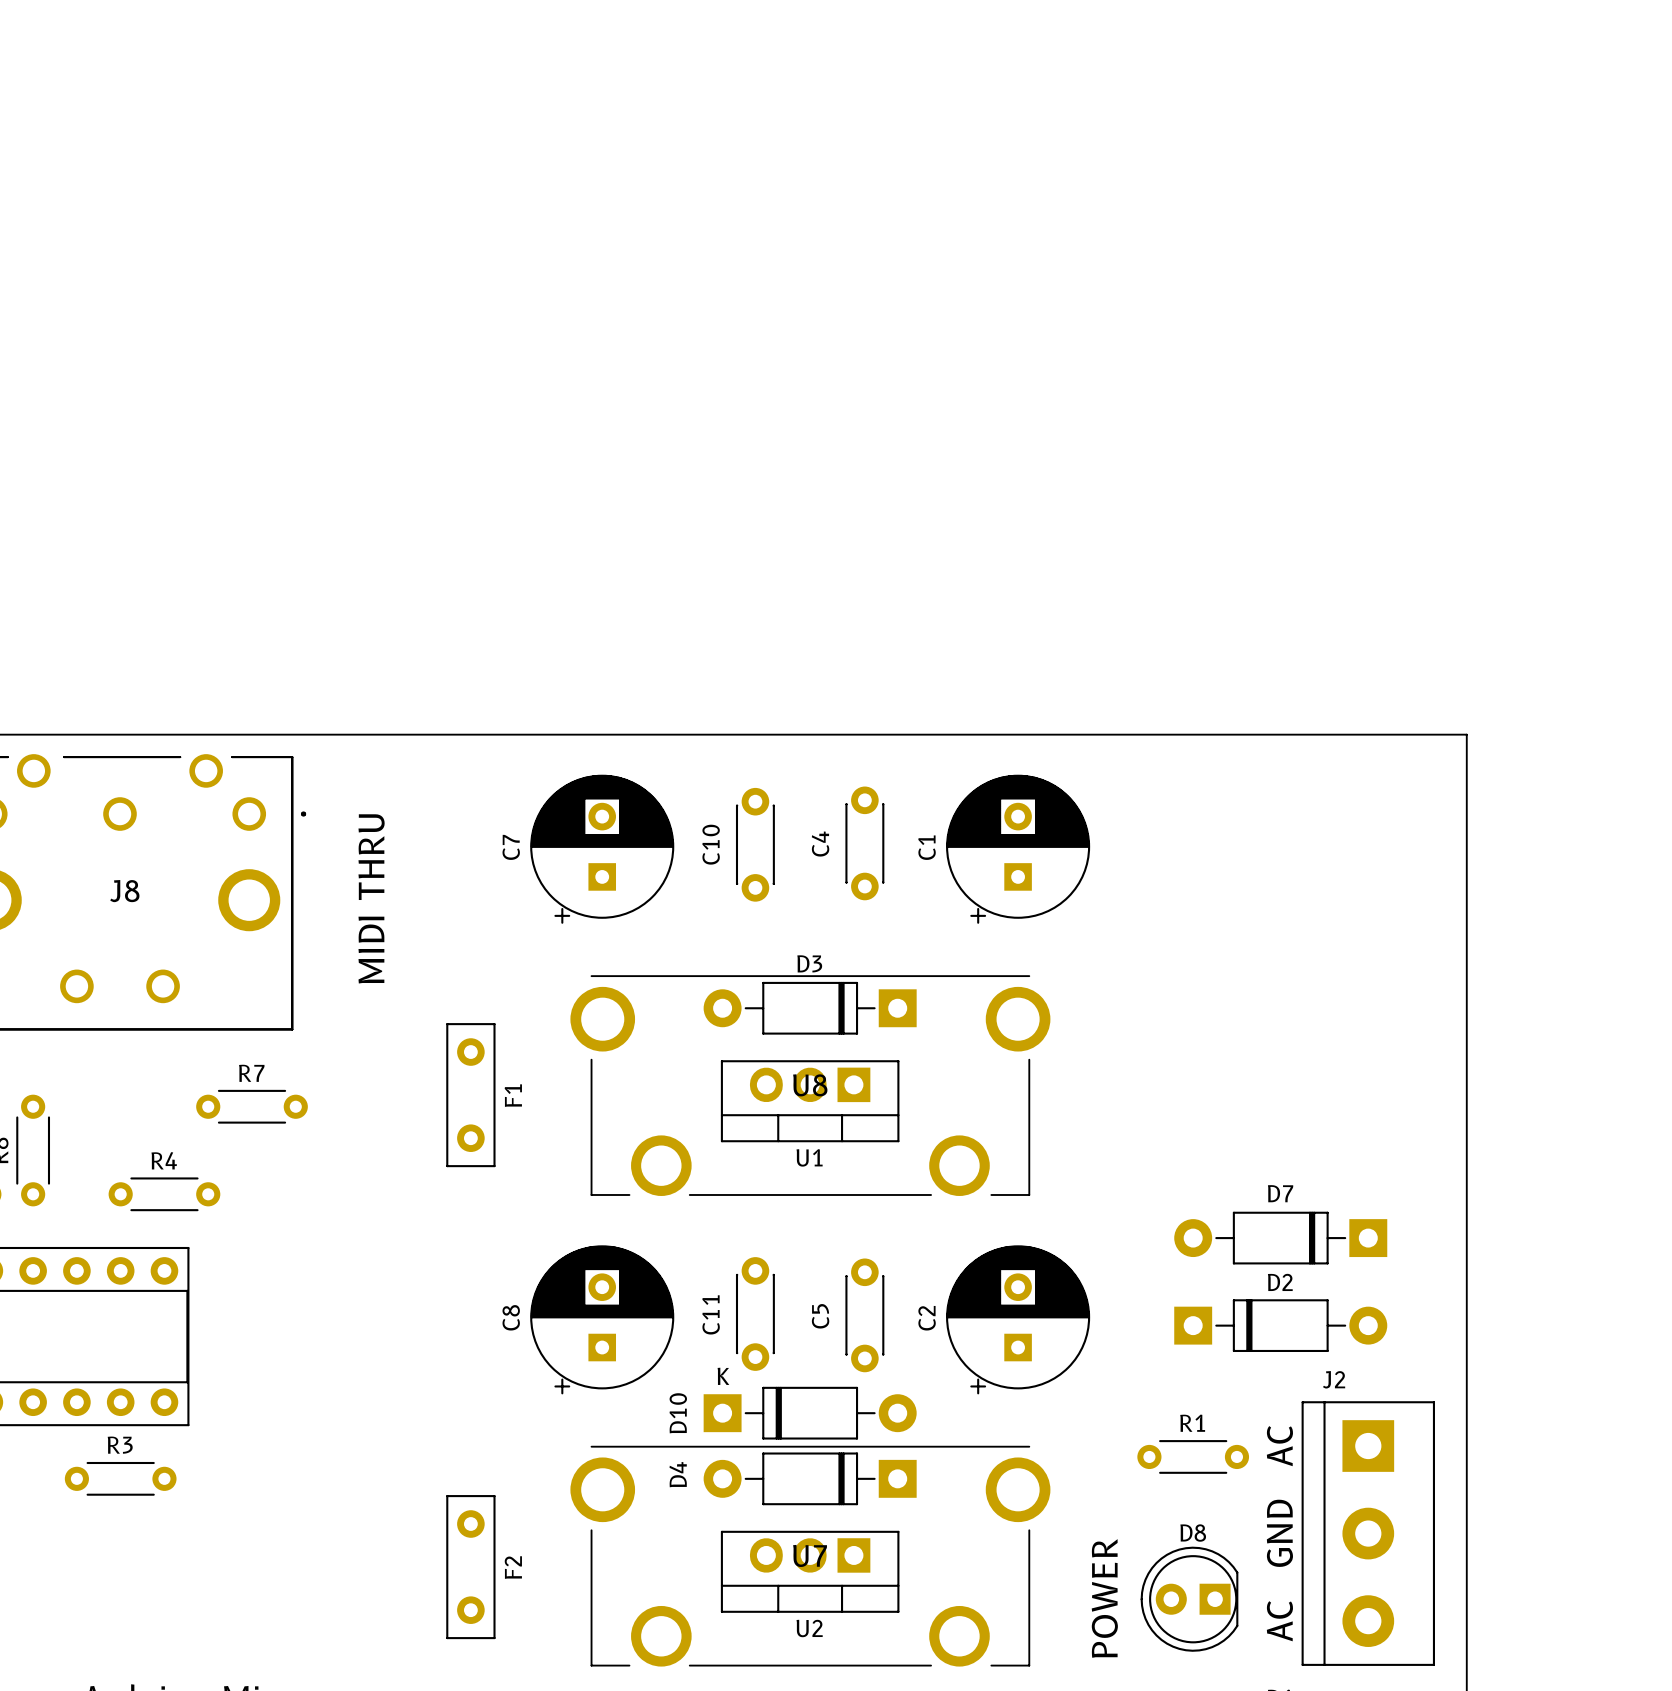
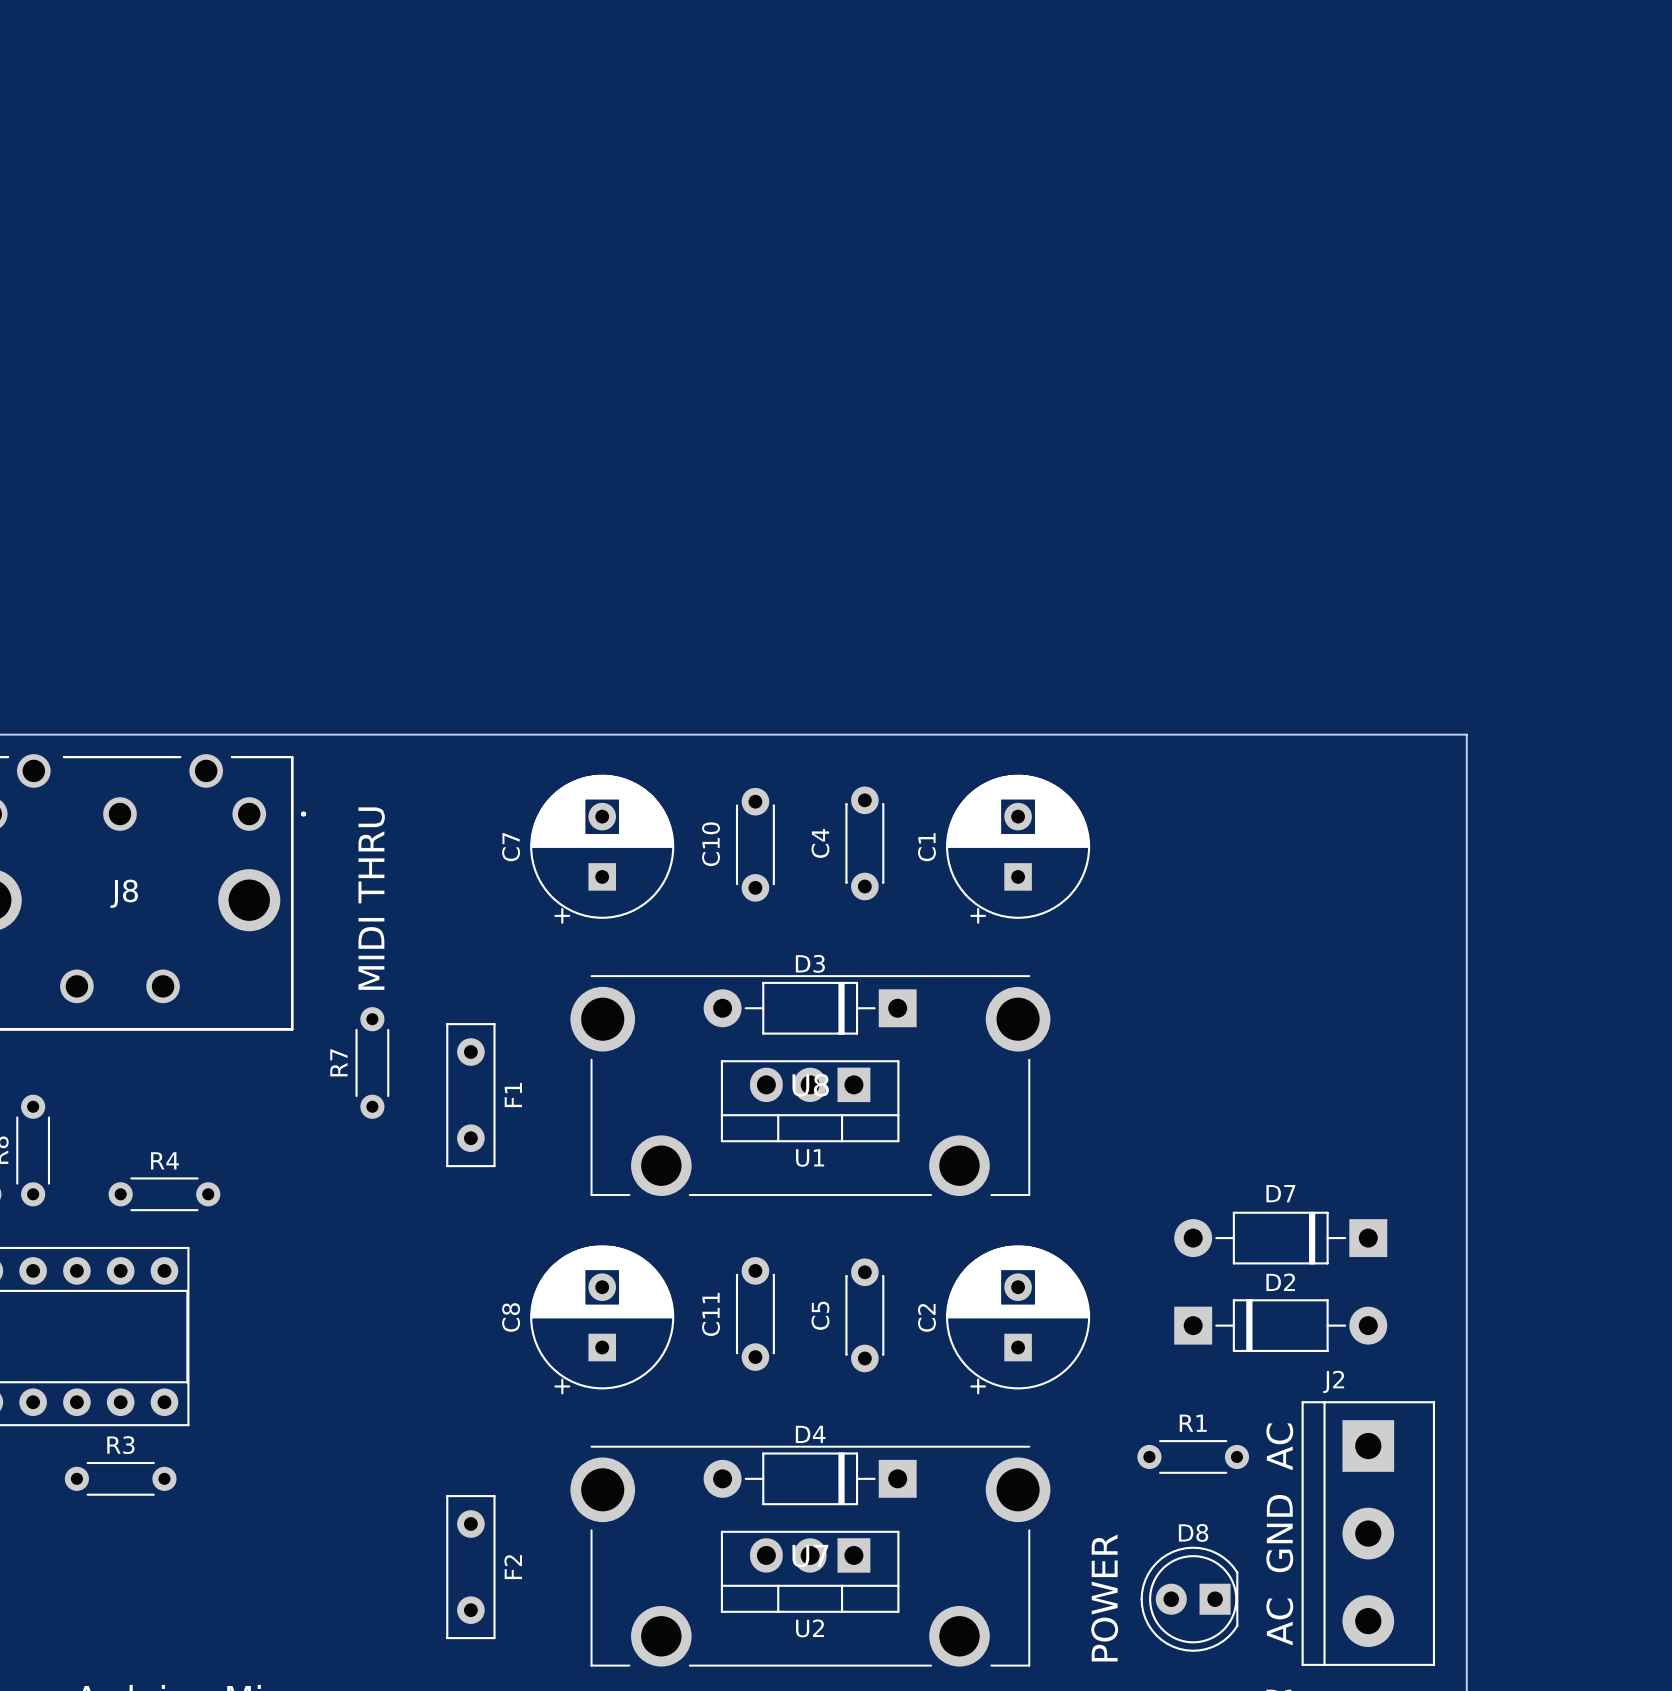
R7 name position: R7 (251, 1073) -> R7 (338, 1062)
R7 rotation: 0° (252, 1106) -> 90° clockwise (372, 1062)
R7 position: (252, 1106) -> (372, 1062)
D10: (810, 1413) -> none
D4 name rotation: 0° (678, 1474) -> 90° clockwise (810, 1434)
D4 name position: D4 (678, 1474) -> D4 (810, 1434)

